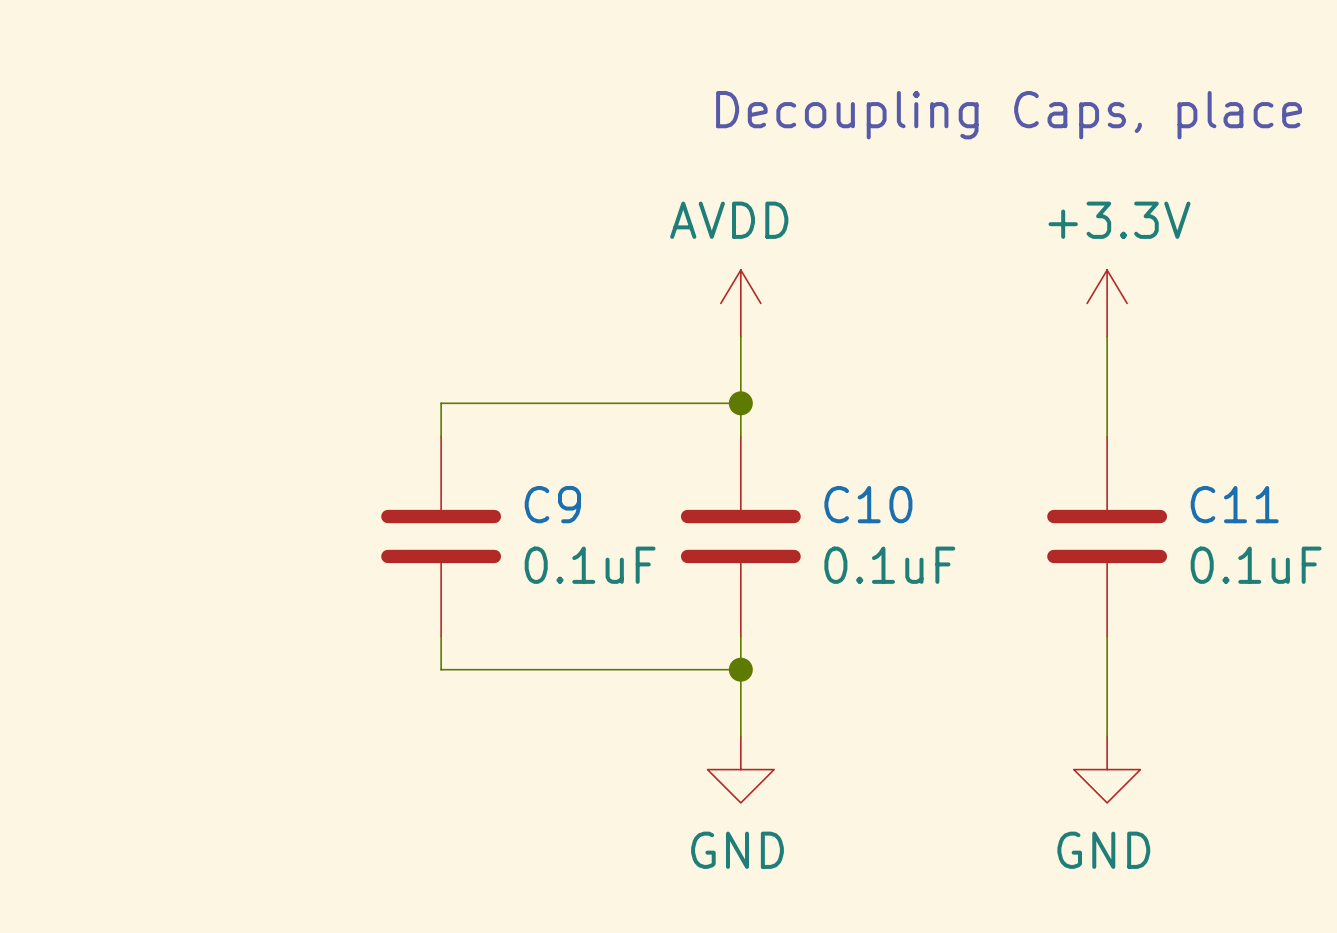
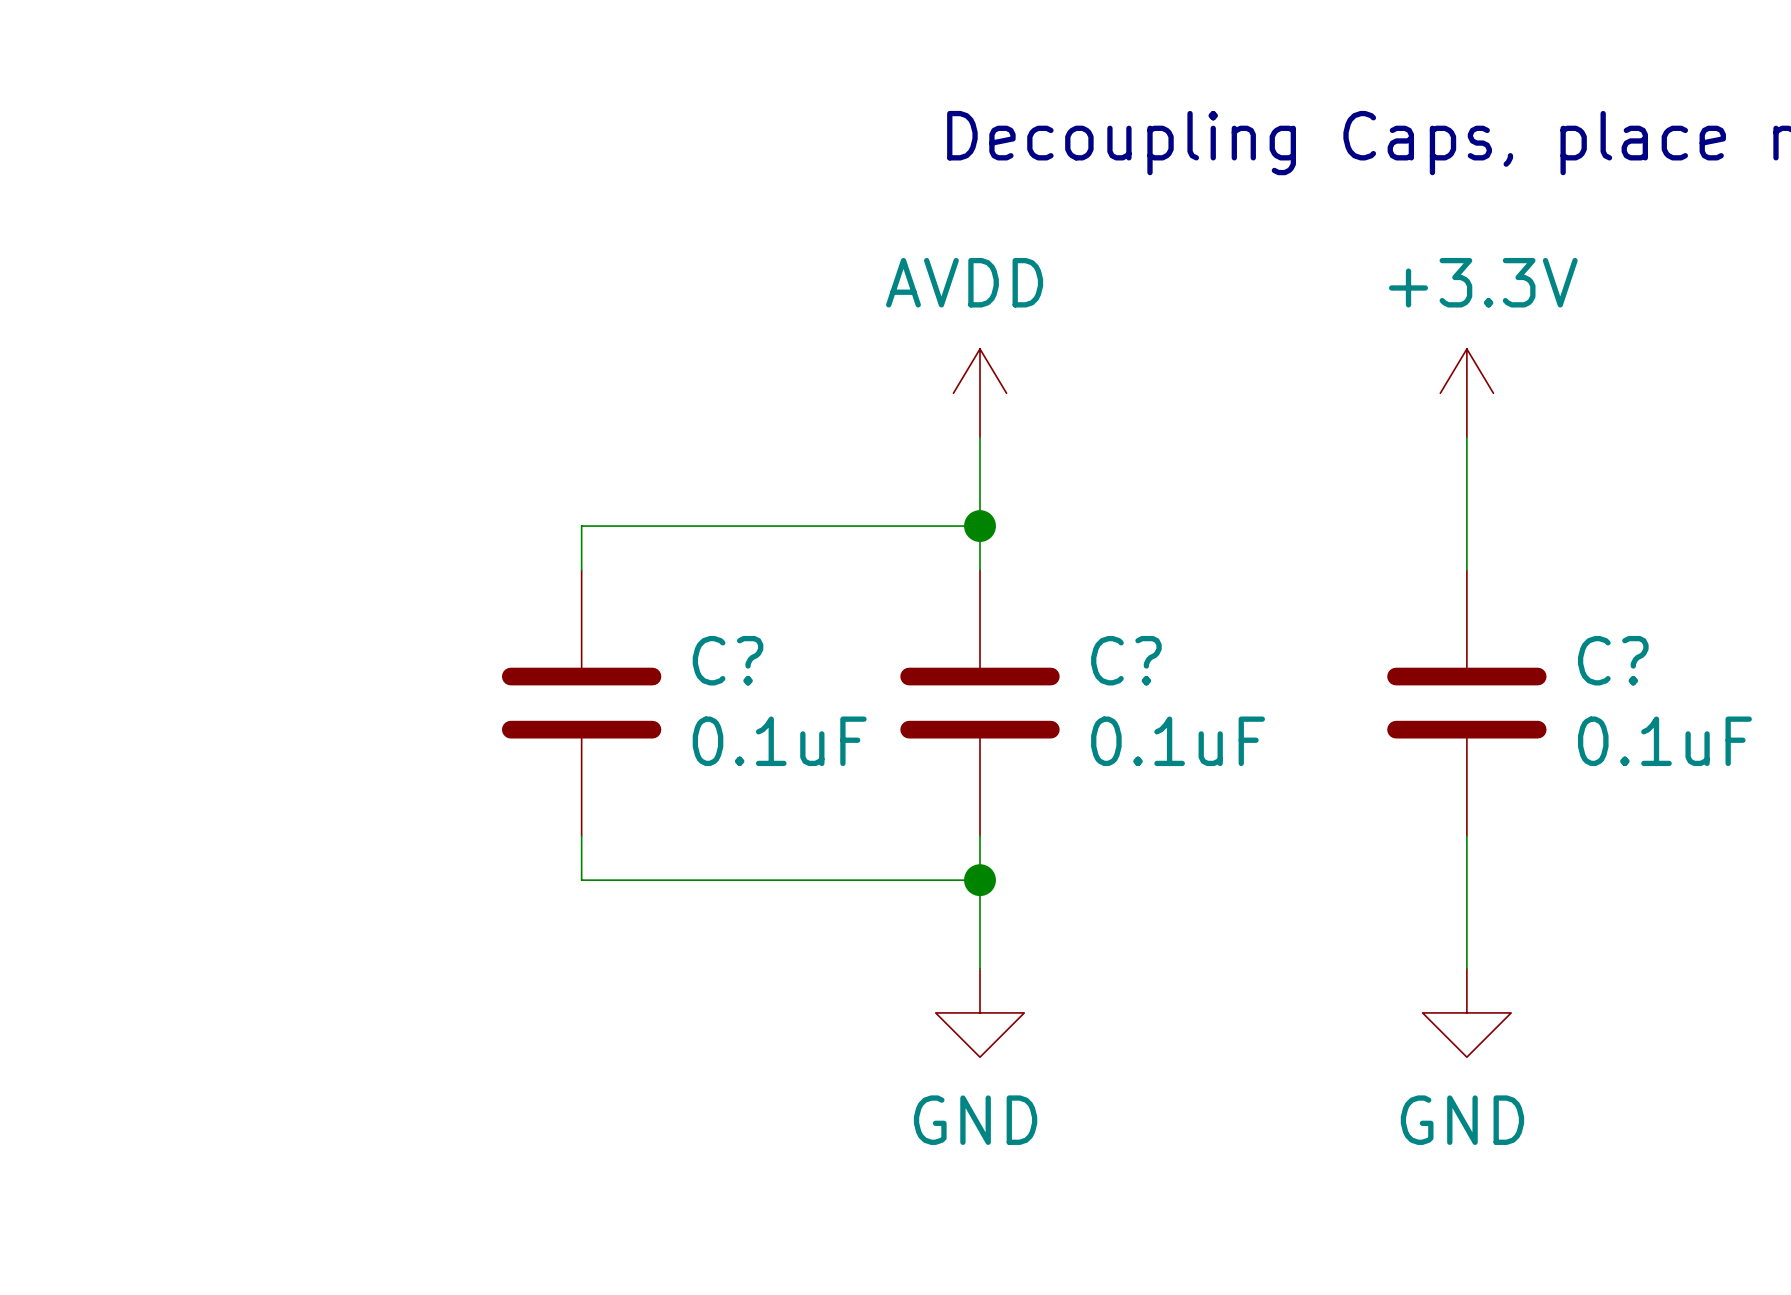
C9 name: C9 (552, 504) -> C? (728, 660)
C10 name: C10 (868, 504) -> C? (1126, 660)
C11 name: C11 (1234, 504) -> C? (1613, 660)

